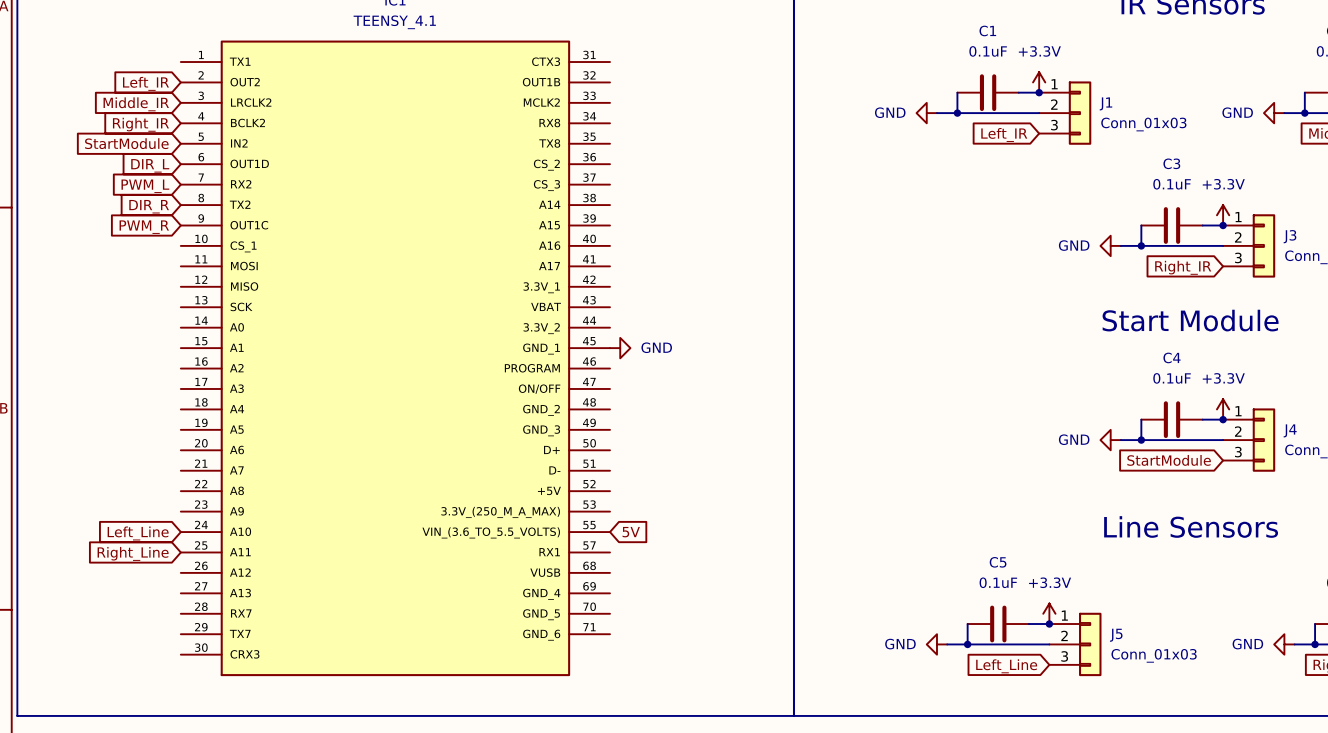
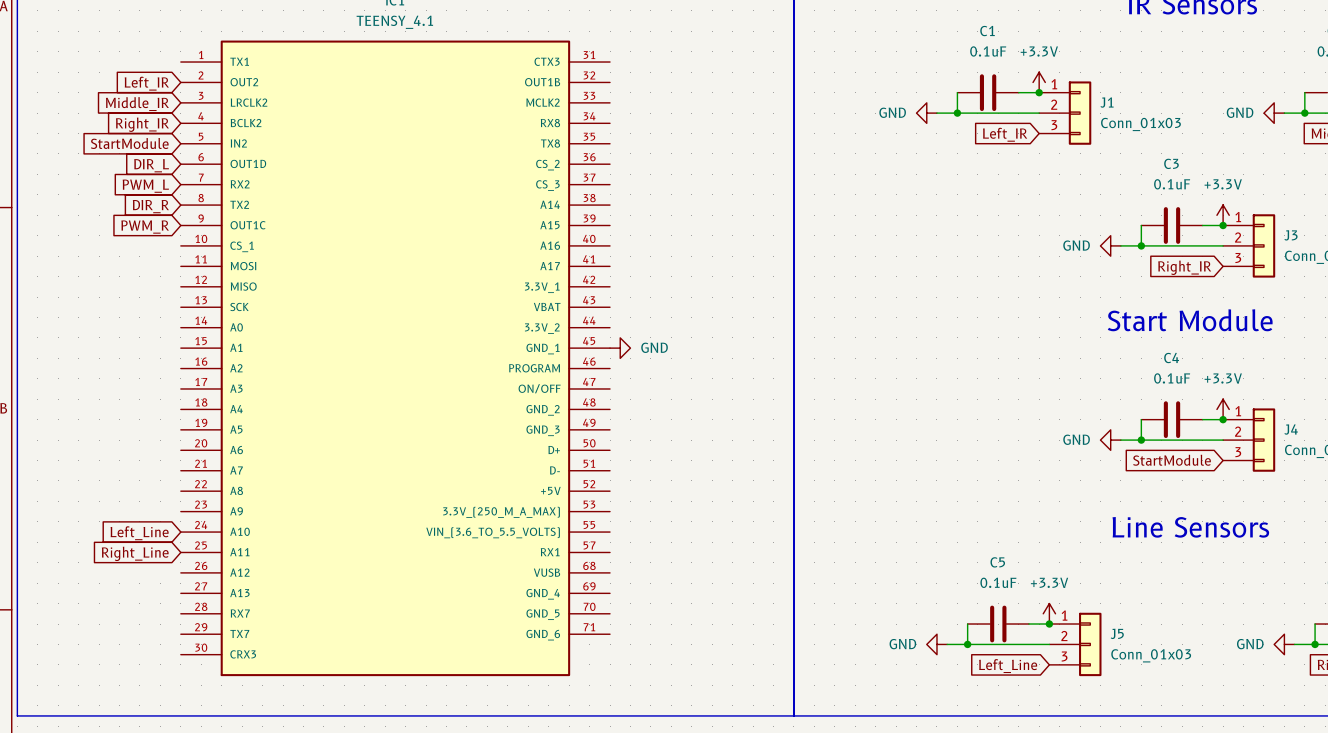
global label: 5V (631, 532) -> none

